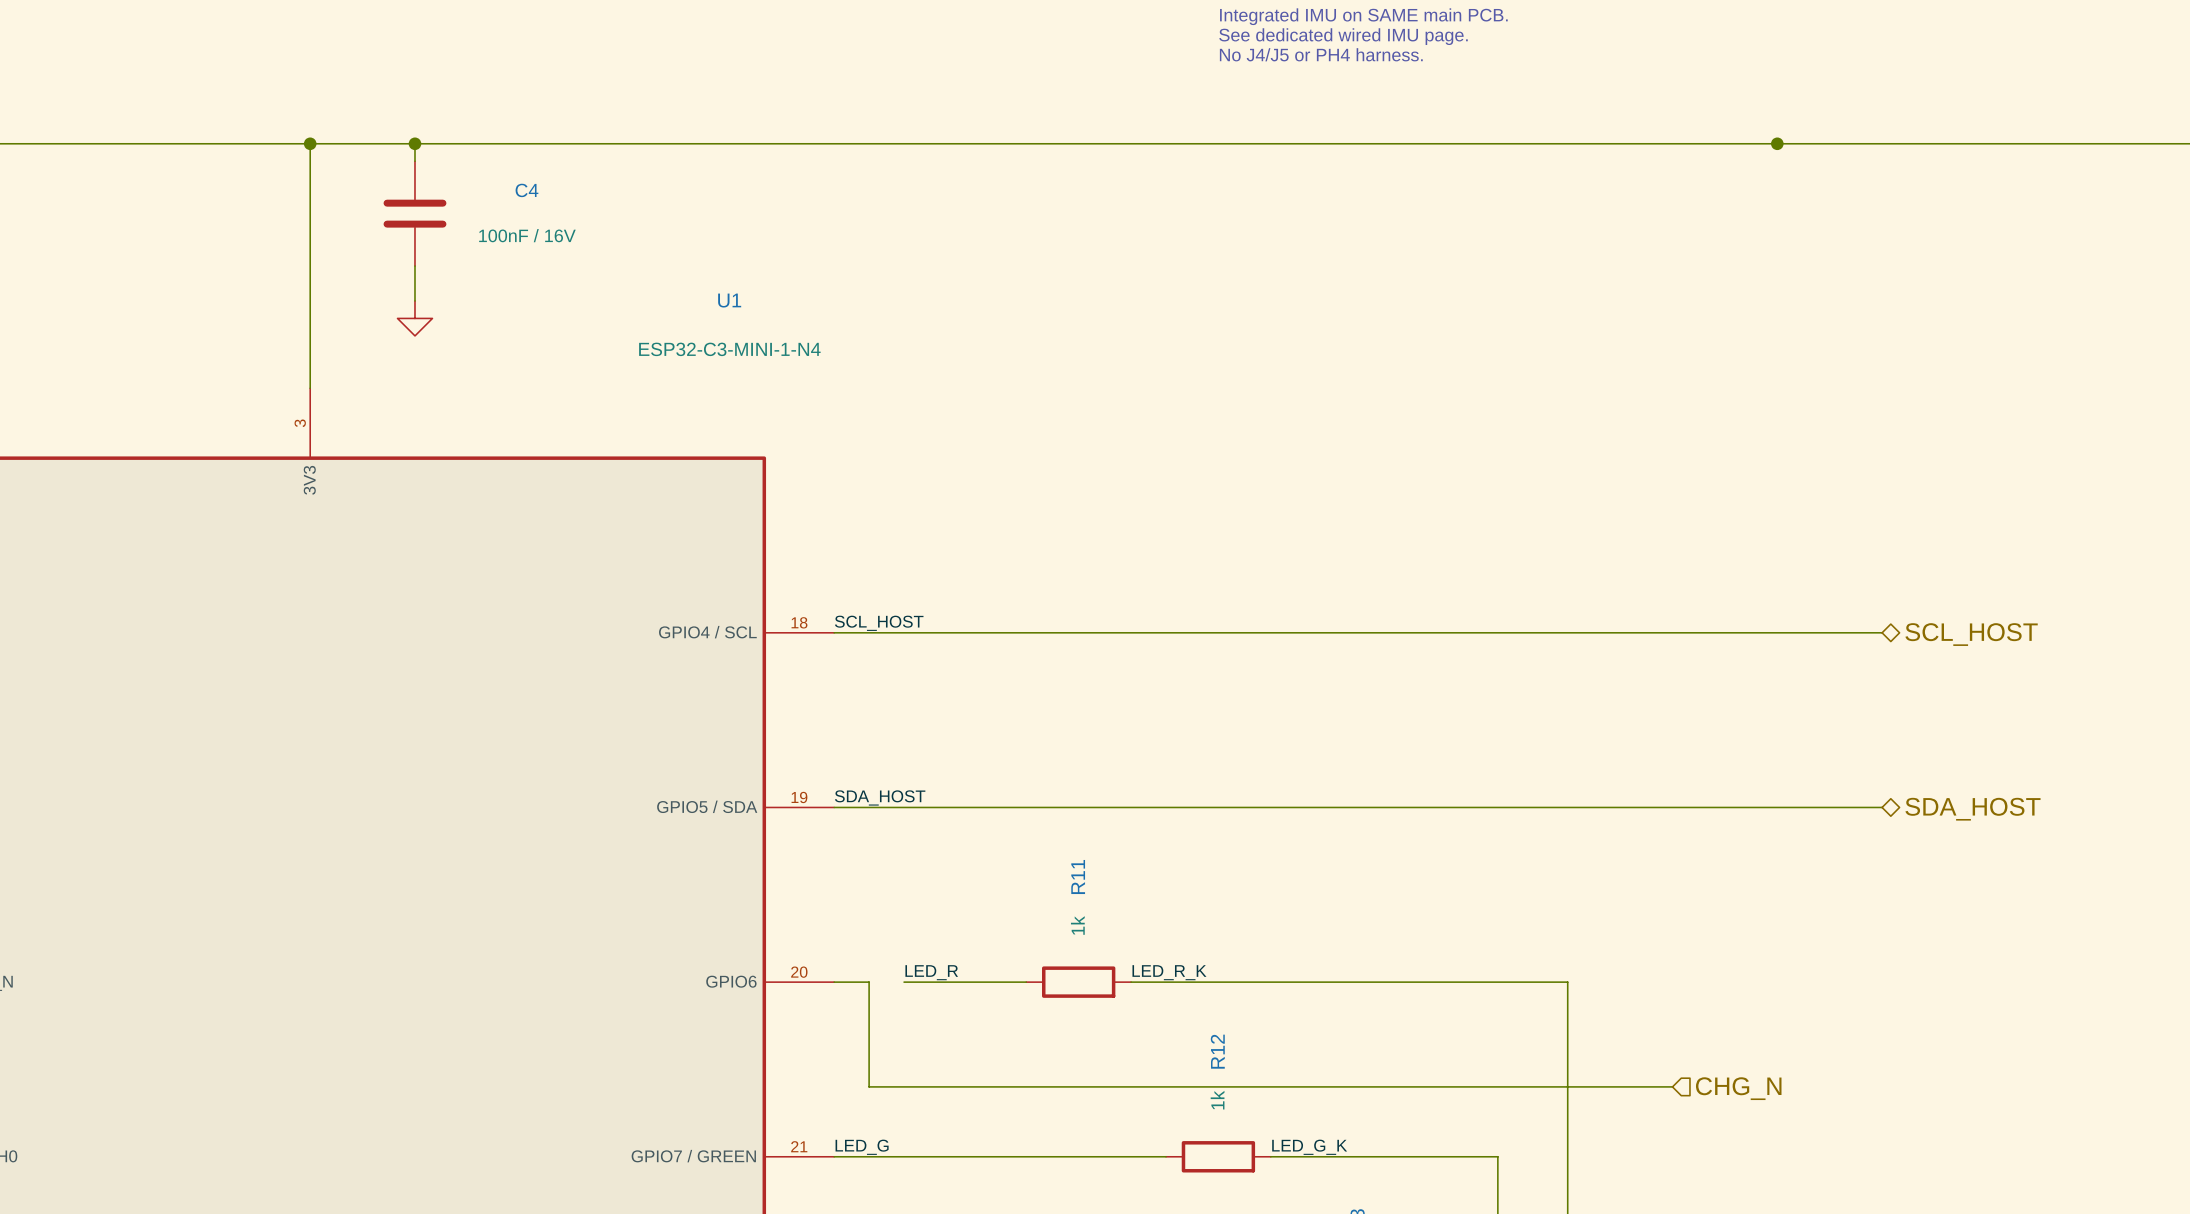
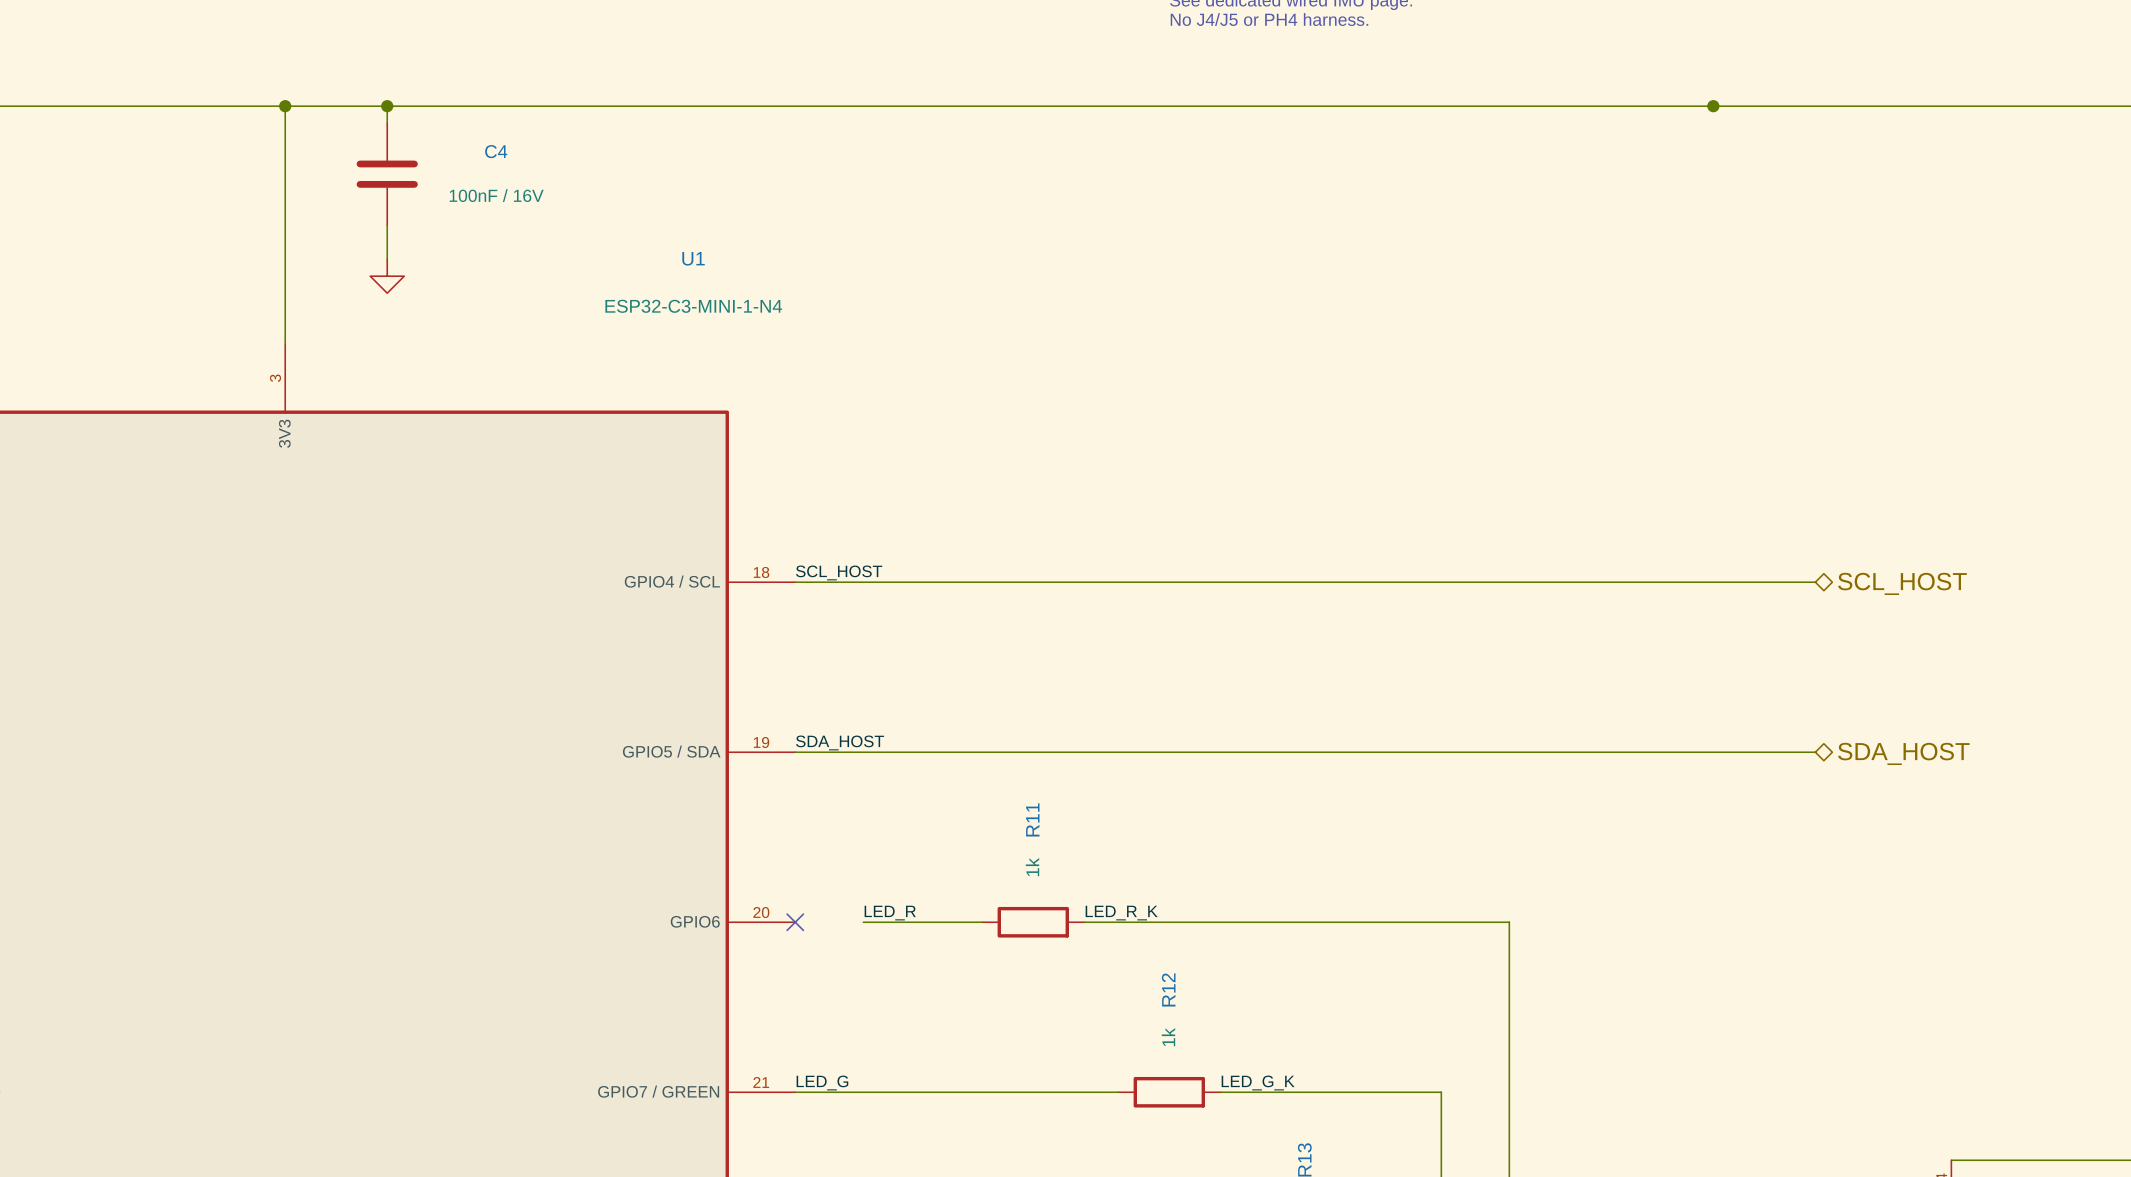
wire: (834, 982) (869, 982) (869, 1086) (1672, 1086) -> none
no-connect mark: none -> (795, 922)
hierarchical label: CHG_N (1738, 1088) -> none

